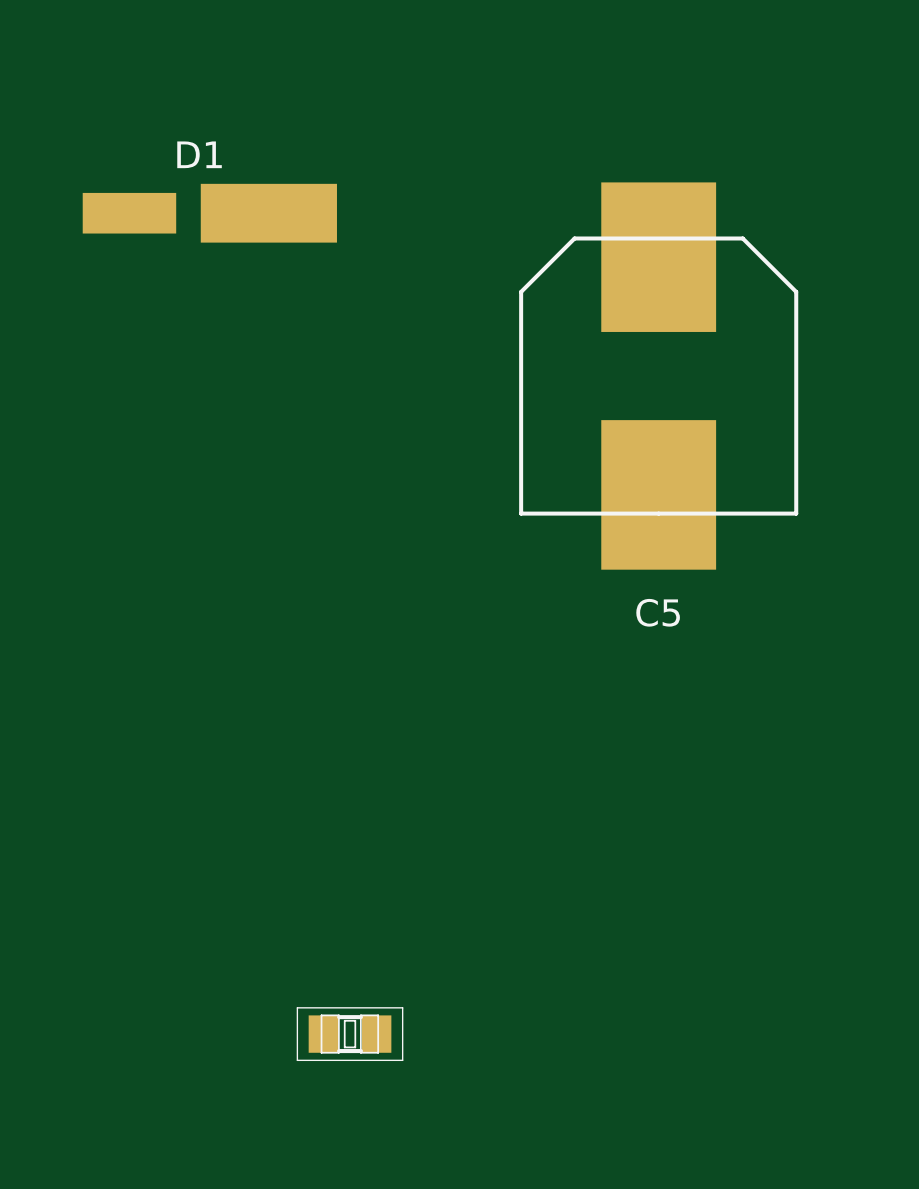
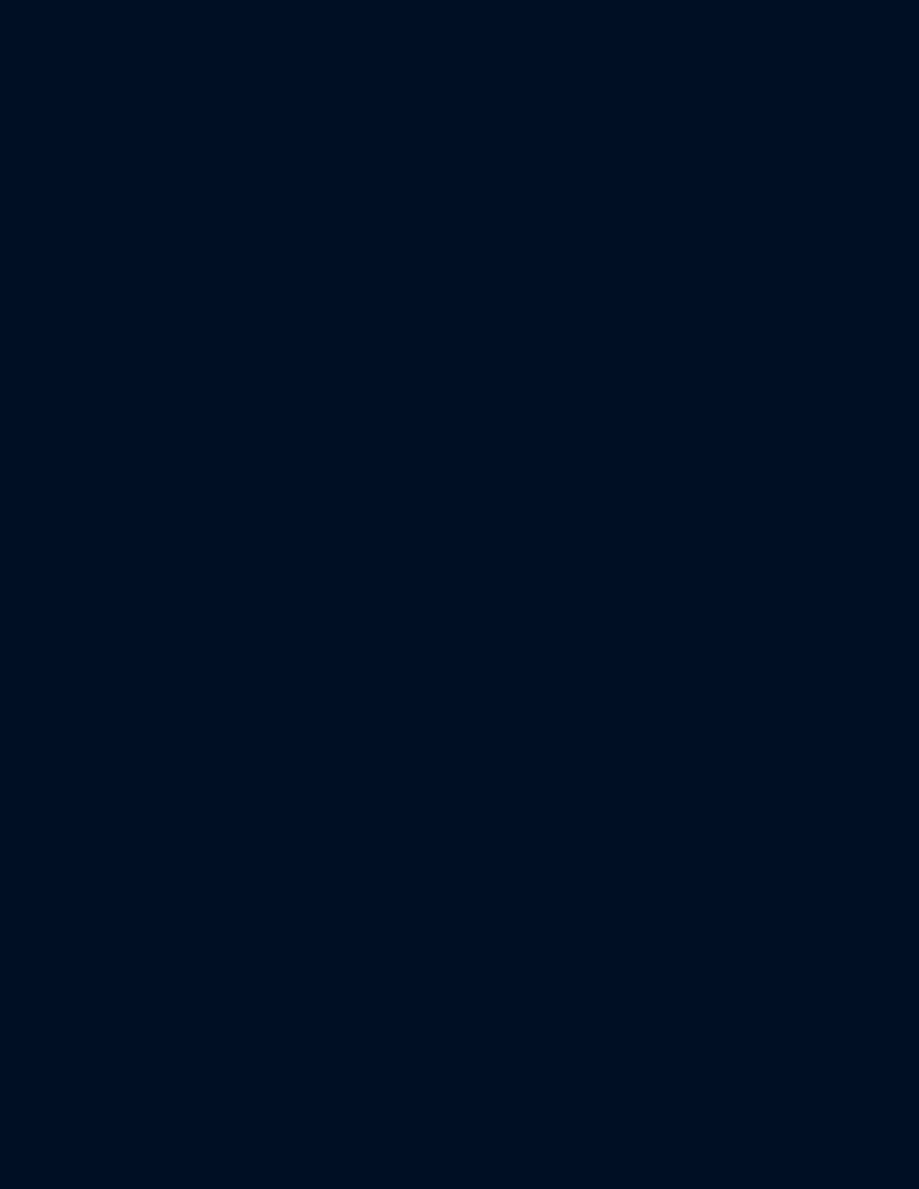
D1: (209, 213) -> none
C5: (658, 376) -> none
part: (350, 1034) -> none

